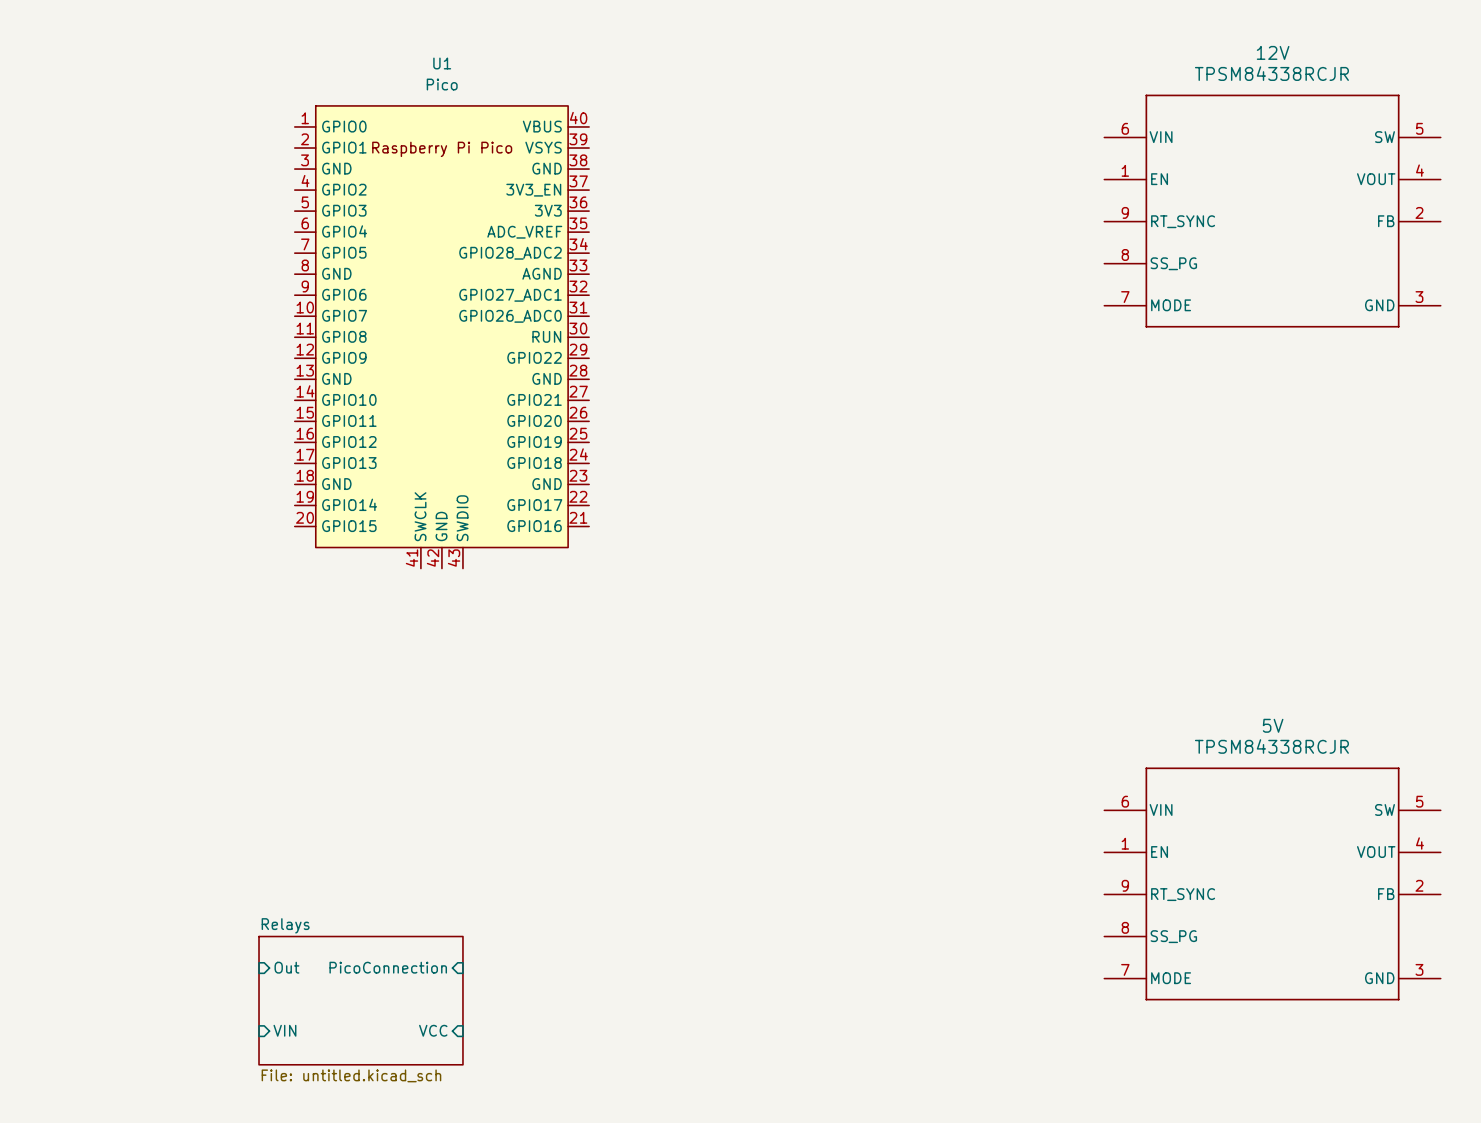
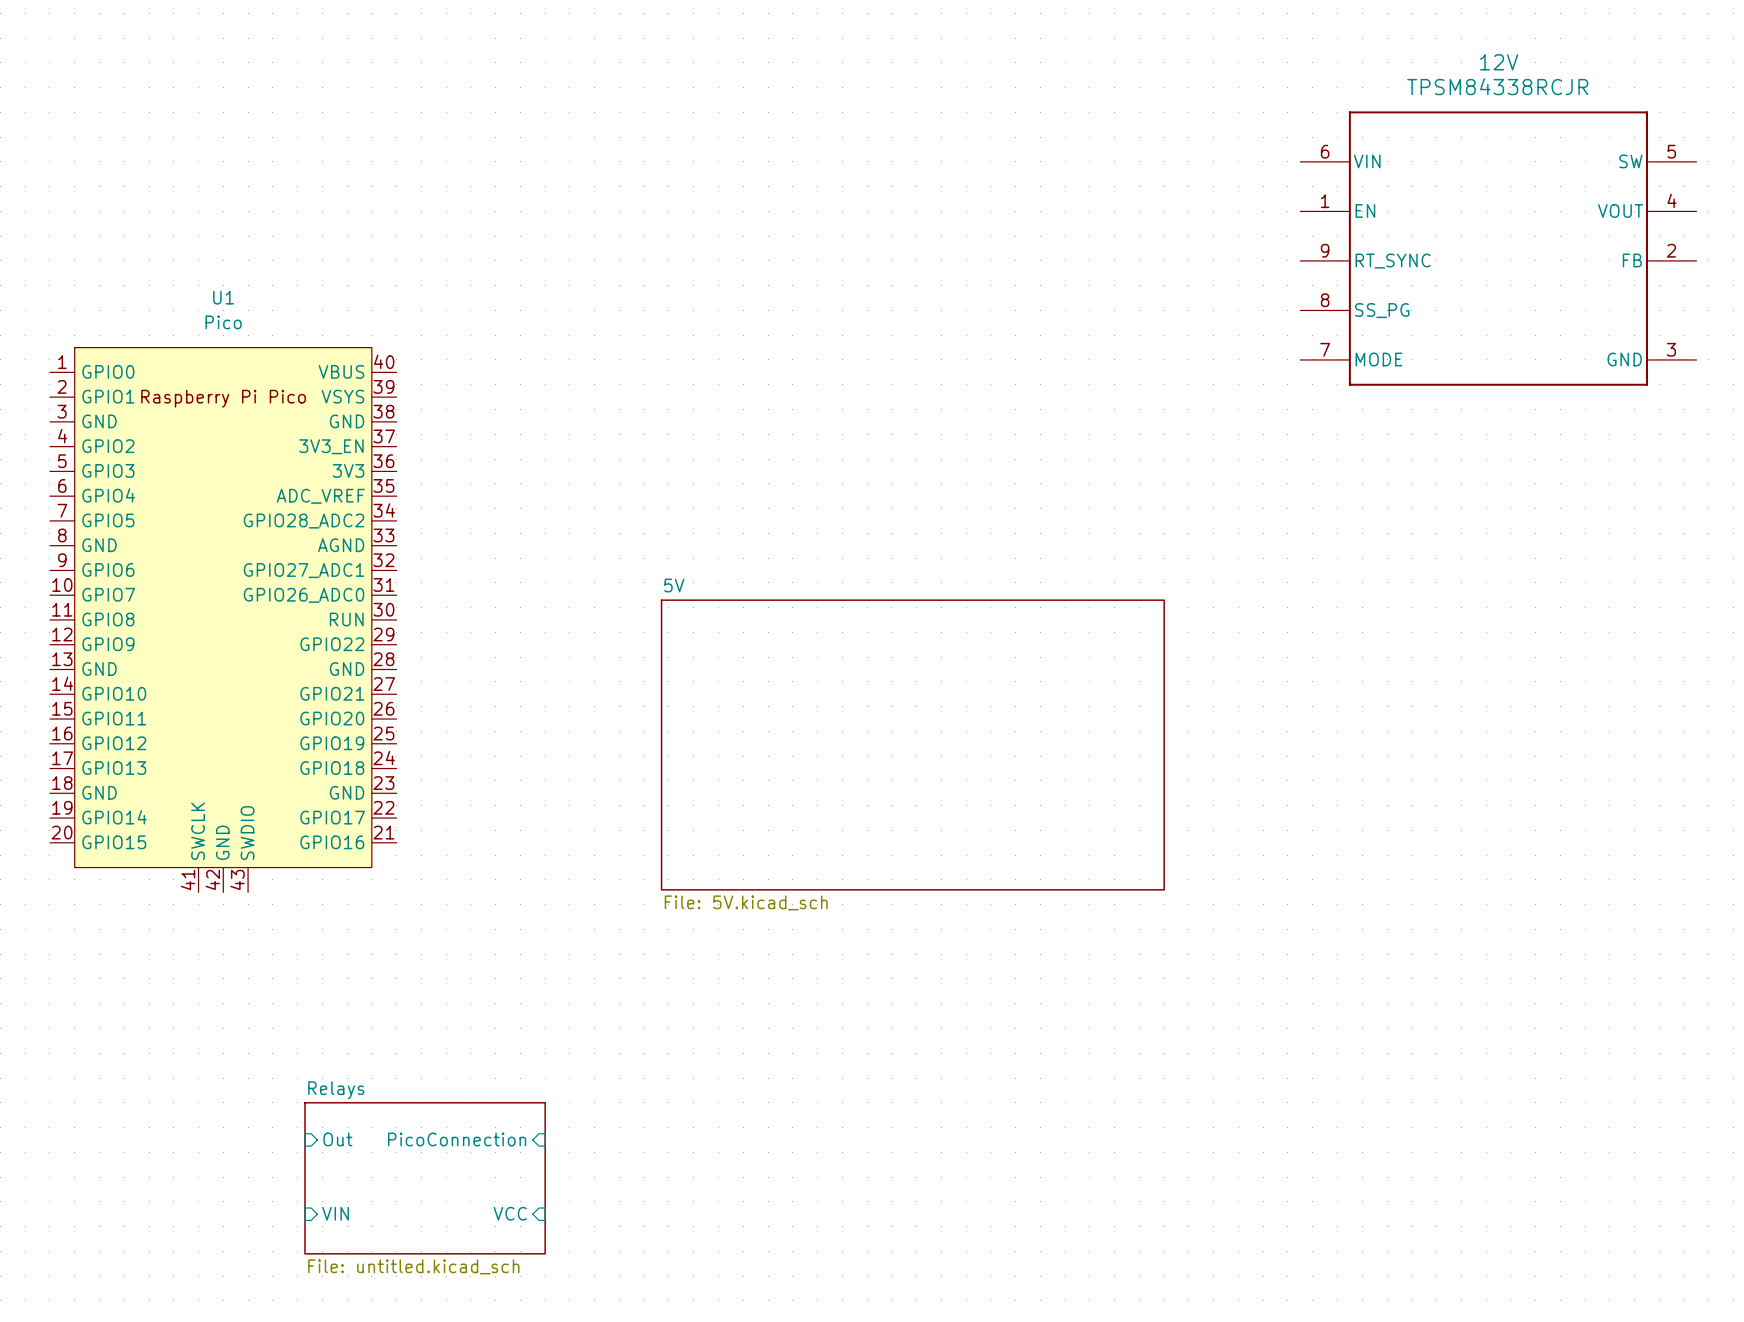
U1 position: (441, 337) -> (223, 619)
sheet 5V: none -> File: 5V.kicad_sch (912, 745)
5V: TPSM84338RCJR (1272, 883) -> none

